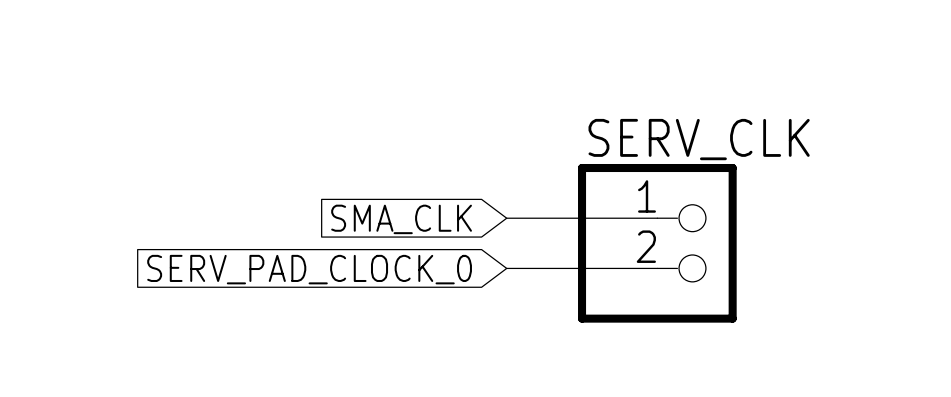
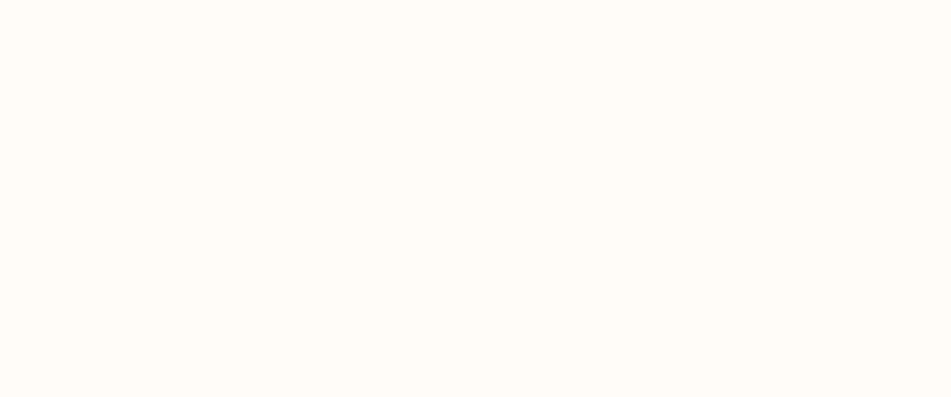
wire: (506, 218) (657, 218) -> none
global label: SMA_CLK (401, 219) -> none
SERV_CLK: (657, 243) -> none
wire: (506, 268) (657, 268) -> none
global label: SERV_PAD_CLOCK_0 (309, 269) -> none

